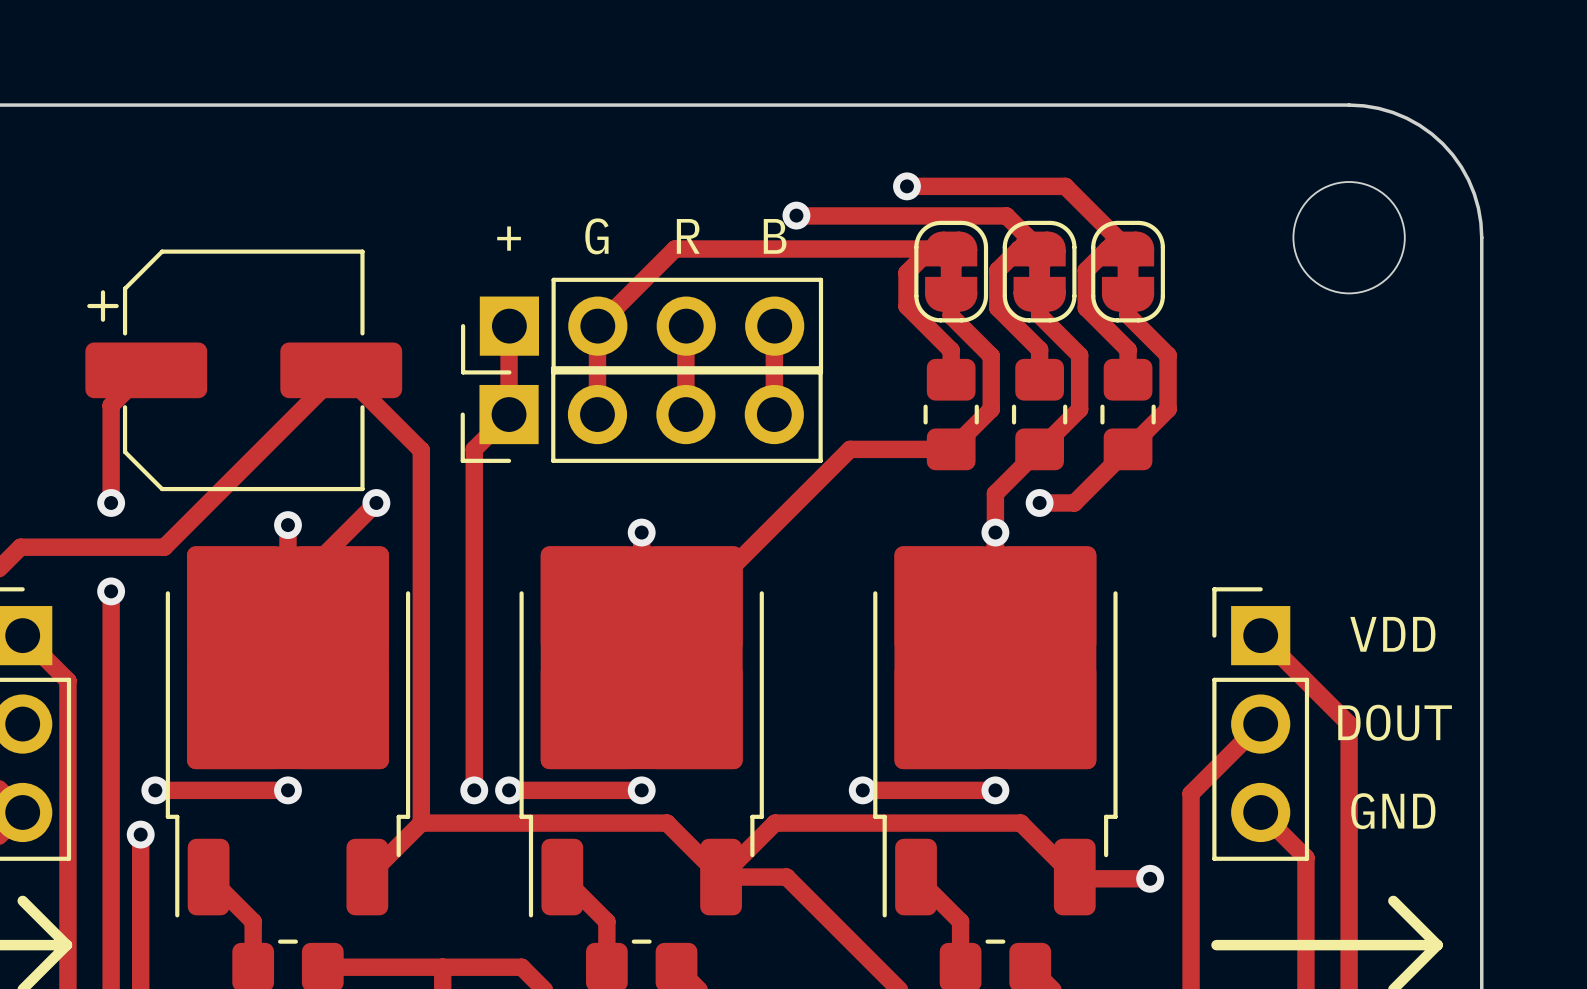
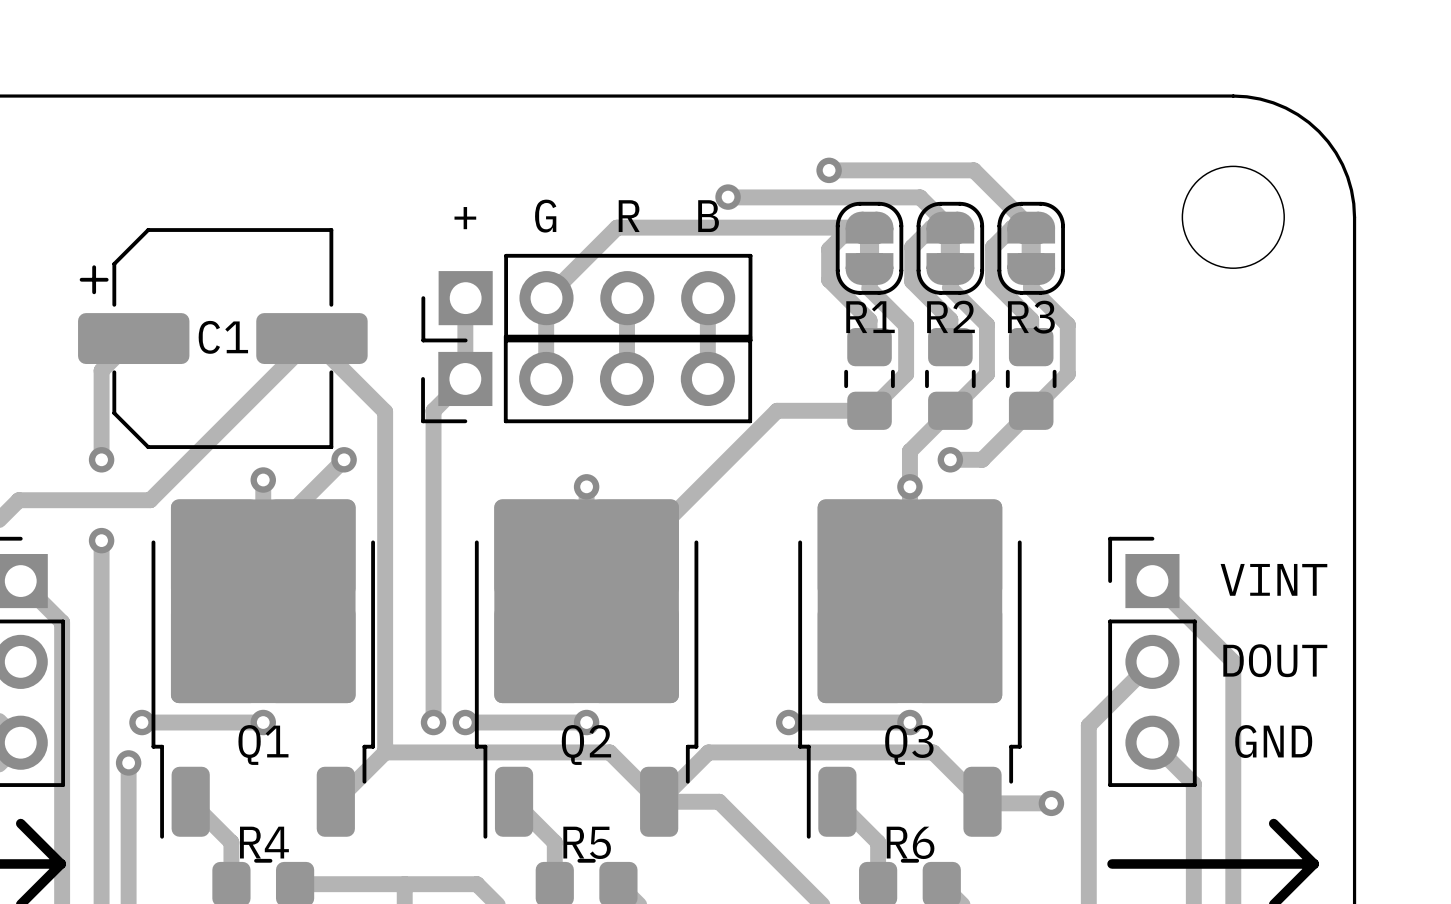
R1 name: none -> R1 (870, 317)
R2 name: none -> R2 (950, 316)
R3 name: none -> R3 (1031, 317)
C1: none -> (222, 338)
text: VDD (1392, 634) -> VINT (1273, 579)
Q1 name: none -> Q1 (263, 745)
Q2 name: none -> Q2 (586, 745)
Q3 name: none -> Q3 (909, 745)
R4 name: none -> R4 (264, 842)
R5 name: none -> R5 (587, 842)
R6 name: none -> R6 (910, 842)

